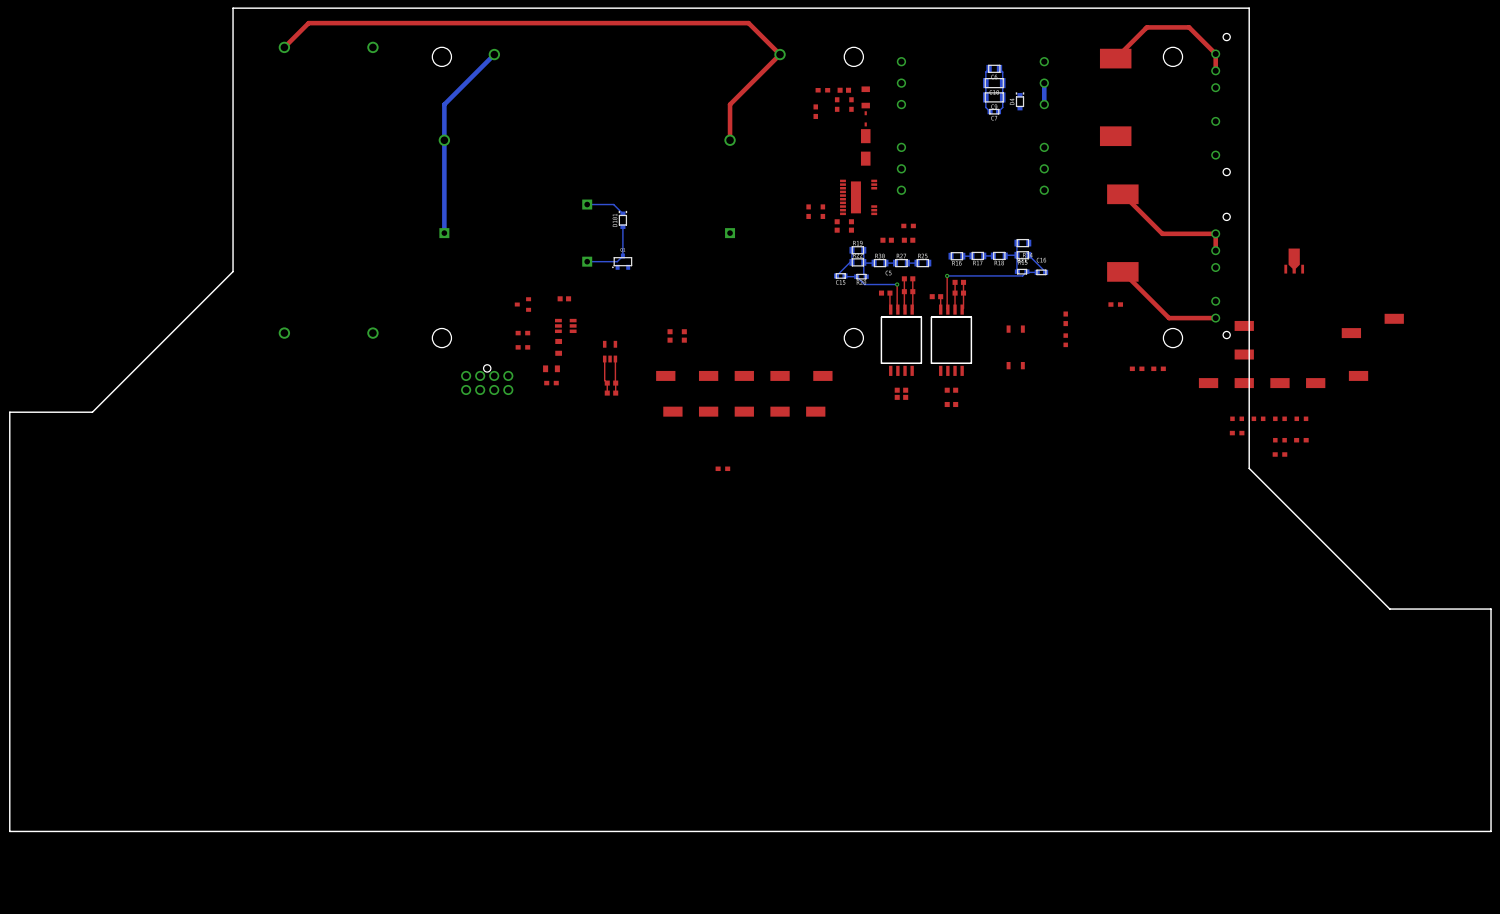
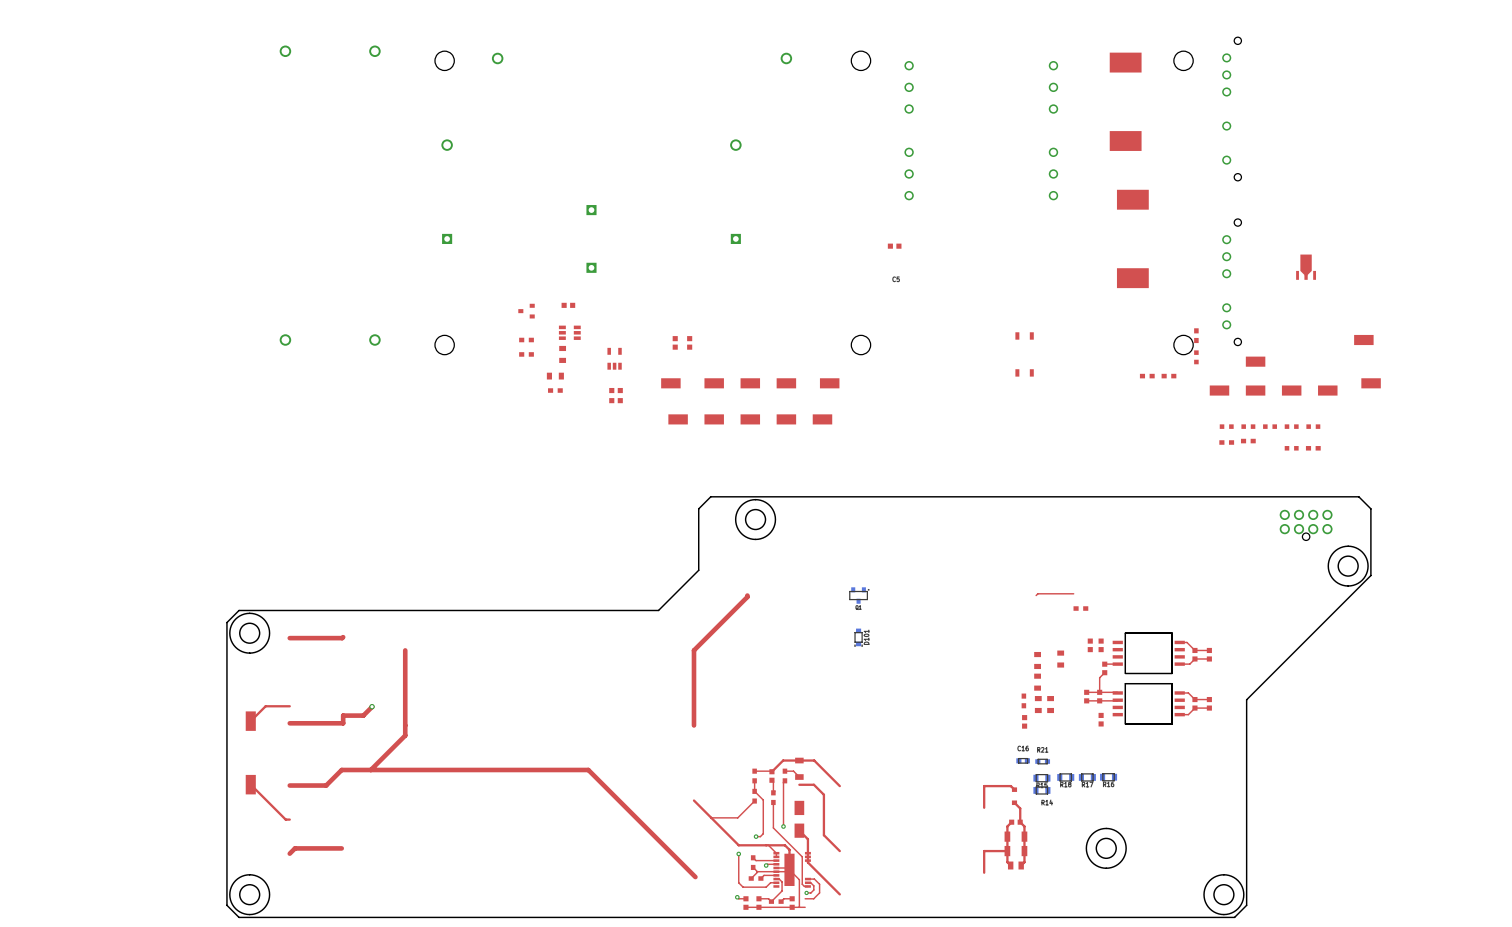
board edge: (1249, 8) (233, 8) (233, 271) (92, 412) (9, 412) (9, 831) (1491, 831) (1491, 609) (1389, 609) (1249, 468) (1249, 8) -> none
top track: (284, 47) (308, 23) (748, 23) (780, 54) (730, 104) (730, 140) -> none
bottom track: (494, 54) (444, 104) (444, 233) -> none
top track: (1115, 58) (1146, 27) (1189, 27) (1215, 53) (1215, 70) -> none
bottom track: (989, 68) (985, 72) (985, 107) (990, 111) -> none
part: (994, 68) -> none
bottom track: (999, 68) (1002, 72) (1002, 107) (998, 111) -> none
part: (994, 83) -> none
bottom track: (1044, 83) (1044, 104) -> none
part: (822, 90) -> none
part: (844, 90) -> none
part: (865, 97) -> none
part: (994, 97) -> none
part: (1020, 101) -> none
part: (837, 104) -> none
part: (851, 104) -> none
part: (815, 111) -> none
part: (994, 111) -> none
part: (865, 118) -> none
part: (865, 147) -> none
top track: (1122, 194) (1162, 233) (1215, 233) (1215, 250) -> none
part: (858, 197) -> none
bottom track: (587, 204) (613, 204) (622, 213) -> none
part: (808, 211) -> none
part: (822, 211) -> none
part rotation: 0° (622, 219) -> 180° (858, 637)
part position: (622, 219) -> (858, 637)
part: (837, 225) -> none
part: (851, 225) -> none
part: (908, 225) -> none
bottom track: (622, 226) (622, 256) (617, 261) (587, 261) -> none
part: (908, 240) -> none
bottom track: (1016, 243) (1017, 271) -> none
part position: (1022, 243) -> (1041, 790)
bottom track: (851, 250) (851, 262) (836, 275) -> none
part: (857, 250) -> none
bottom track: (863, 250) (863, 274) (866, 276) -> none
bottom track: (971, 255) (962, 256) -> none
part position: (977, 255) -> (1087, 777)
bottom track: (993, 255) (983, 255) -> none
part position: (999, 255) -> (1065, 777)
bottom track: (1016, 255) (1005, 255) -> none
part position: (1022, 255) -> (1041, 778)
bottom track: (1028, 255) (1045, 272) -> none
part position: (956, 256) -> (1108, 777)
part rotation: 0° (622, 261) -> 180° (859, 595)
part position: (622, 261) -> (859, 595)
part: (857, 262) -> none
bottom track: (874, 263) (863, 263) -> none
part: (880, 263) -> none
bottom track: (895, 263) (885, 263) -> none
part: (901, 263) -> none
bottom track: (916, 263) (907, 263) -> none
part: (922, 263) -> none
part position: (1022, 271) -> (1042, 761)
top track: (1122, 271) (1169, 318) (1215, 318) -> none
bottom track: (1037, 272) (1026, 271) (1022, 275) (947, 275) -> none
part position: (1041, 272) -> (1023, 760)
part: (840, 275) -> none
bottom track: (844, 275) (856, 276) (864, 284) (897, 284) -> none
top track: (947, 275) (947, 309) -> none
via: (947, 275) -> none
part: (861, 276) -> none
top track: (904, 278) (905, 309) -> none
part: (908, 278) -> none
top track: (912, 278) (912, 309) -> none
top track: (955, 282) (955, 293) -> none
part: (959, 282) -> none
top track: (963, 282) (962, 309) -> none
top track: (897, 284) (897, 309) -> none
via: (897, 284) -> none
part: (908, 291) -> none
part: (885, 293) -> none
top track: (889, 293) (890, 309) -> none
top track: (955, 293) (955, 309) -> none
part: (959, 293) -> none
part: (936, 296) -> none
top track: (940, 296) (940, 309) -> none
part: (1115, 304) -> none
part: (1065, 318) -> none
part: (1394, 318) -> none
part: (1244, 325) -> none
part: none -> (1196, 335)
part: (901, 340) -> none
part: (951, 340) -> none
part: (1065, 340) -> none
part: none -> (1196, 357)
top track: (604, 359) (604, 380) (607, 383) (607, 393) -> none
top track: (615, 359) (615, 393) -> none
part: (487, 379) -> none
part: (901, 390) -> none
part: (951, 390) -> none
part: (901, 397) -> none
part: (951, 404) -> none
part: none -> (1226, 426)
part position: (1279, 454) -> (1226, 442)
part: (722, 468) -> none
board edge: none -> (1358, 496) (1370, 508) (1370, 575) (1246, 699) (1246, 905) (1234, 917) (239, 917) (226, 905) (226, 622) (239, 610) (658, 610) (698, 570) (698, 508) (710, 496) (1358, 496)
board edge: none -> (755, 499) (763, 501) (769, 505) (773, 511) (775, 519) (773, 527) (769, 533) (763, 537) (755, 539) (747, 537) (741, 533) (737, 527) (735, 519) (737, 511) (741, 505) (747, 501) (755, 499)
round board edge: none -> [744, 508, 767, 531]
part: none -> (1306, 525)
board edge: none -> (1348, 546) (1355, 547) (1362, 552) (1366, 558) (1368, 566) (1366, 573) (1362, 580) (1355, 584) (1348, 586) (1340, 584) (1334, 580) (1329, 573) (1328, 566) (1329, 558) (1334, 552) (1340, 547) (1348, 546)
round board edge: none -> [1337, 555, 1359, 577]
top track: none -> (1073, 593) (1037, 593) (1036, 595)
top track: none -> (747, 595) (693, 650) (693, 725)
part: none -> (1080, 608)
board edge: none -> (249, 613) (257, 614) (263, 619) (268, 625) (269, 633) (268, 640) (263, 647) (257, 651) (249, 653) (242, 651) (235, 647) (231, 640) (229, 633) (231, 625) (235, 619) (242, 614) (249, 613)
round board edge: none -> [239, 622, 261, 644]
top track: none -> (343, 637) (289, 638)
top track: none -> (1179, 642) (1186, 642) (1194, 650) (1209, 650)
part: none -> (1090, 645)
part: none -> (1101, 645)
top track: none -> (405, 650) (405, 735) (370, 769)
part: none -> (1148, 653)
part: none -> (1194, 654)
part: none -> (1209, 654)
part: none -> (1060, 659)
top track: none -> (1209, 658) (1194, 658) (1189, 664) (1179, 664)
part: none -> (1037, 660)
top track: none -> (1117, 664) (1104, 664)
part: none -> (1104, 668)
top track: none -> (1104, 672) (1099, 677) (1099, 692)
part: none -> (1037, 682)
top track: none -> (1086, 692) (1117, 692)
top track: none -> (1179, 692) (1188, 692) (1194, 699) (1209, 699)
part: none -> (1086, 696)
part: none -> (1099, 696)
top track: none -> (1117, 700) (1086, 700)
part: none -> (1023, 700)
part: none -> (1038, 704)
part: none -> (1050, 704)
part: none -> (1148, 703)
part: none -> (1194, 703)
part: none -> (1209, 703)
top track: none -> (289, 706) (265, 706) (250, 721)
top track: none -> (372, 706) (363, 715) (343, 715) (343, 723) (289, 723)
via: none -> (372, 706)
top track: none -> (1209, 708) (1194, 708) (1188, 714) (1179, 714)
part: none -> (1101, 719)
part: none -> (250, 721)
part: none -> (1024, 721)
part: none -> (799, 768)
top track: none -> (754, 771) (771, 771) (783, 760) (814, 760) (839, 786)
top track: none -> (784, 771) (793, 771) (799, 777)
part: none -> (754, 776)
part: none -> (771, 776)
part: none -> (784, 776)
top track: none -> (771, 780) (773, 792) (774, 791)
top track: none -> (754, 780) (754, 791) (763, 800) (763, 833) (760, 836) (756, 836)
top track: none -> (784, 780) (783, 826)
top track: none -> (250, 784) (285, 819) (289, 819)
part: none -> (250, 784)
top track: none -> (289, 785) (326, 785) (341, 769) (588, 769) (695, 877)
top track: none -> (799, 784) (813, 784) (823, 794) (823, 835) (839, 851)
top track: none -> (1014, 789) (1010, 786) (984, 786) (984, 807)
part: none -> (754, 796)
part: none -> (1014, 796)
part: none -> (773, 797)
top track: none -> (693, 800) (738, 845) (784, 845) (789, 849) (789, 869) (787, 871) (757, 871)
top track: none -> (754, 801) (737, 817) (711, 817)
top track: none -> (773, 802) (773, 827) (802, 856) (802, 884) (807, 886)
top track: none -> (1014, 802) (1020, 808) (1020, 822) (1024, 826) (1024, 862) (1021, 865)
part: none -> (799, 819)
top track: none -> (1011, 822) (1007, 826) (1007, 862) (1010, 865)
part: none -> (1015, 822)
via: none -> (783, 826)
board edge: none -> (1106, 828) (1113, 829) (1120, 834) (1124, 840) (1126, 848) (1124, 855) (1120, 862) (1113, 866) (1106, 868) (1098, 866) (1092, 862) (1087, 855) (1086, 848) (1087, 840) (1092, 834) (1098, 829) (1106, 828)
top track: none -> (799, 830) (807, 839) (807, 862) (839, 894)
via: none -> (756, 836)
part: none -> (1015, 836)
round board edge: none -> [1095, 837, 1117, 860]
top track: none -> (766, 845) (776, 853) (776, 856)
top track: none -> (341, 848) (295, 848) (289, 853)
top track: none -> (1007, 851) (984, 851) (984, 872)
part: none -> (1015, 851)
top track: none -> (738, 853) (738, 882) (743, 887) (766, 887) (770, 882) (776, 882)
via: none -> (738, 853)
top track: none -> (753, 857) (755, 860) (776, 860)
part: none -> (753, 862)
top track: none -> (776, 864) (766, 865)
via: none -> (766, 865)
part: none -> (1015, 865)
top track: none -> (753, 867) (757, 871)
top track: none -> (776, 867) (787, 867) (799, 879) (799, 907)
part: none -> (792, 869)
top track: none -> (757, 871) (751, 878)
board edge: none -> (249, 874) (257, 876) (263, 880) (268, 887) (269, 894) (268, 902) (263, 908) (257, 913) (249, 914) (242, 913) (235, 908) (231, 902) (229, 894) (231, 887) (235, 880) (242, 876) (249, 874)
top track: none -> (776, 875) (764, 875) (760, 878)
board edge: none -> (1223, 874) (1231, 876) (1237, 880) (1242, 887) (1243, 894) (1242, 902) (1237, 908) (1231, 913) (1223, 914) (1216, 913) (1209, 908) (1205, 902) (1204, 894) (1205, 887) (1209, 880) (1216, 876) (1223, 874)
part: none -> (756, 878)
top track: none -> (775, 878) (782, 881) (782, 890) (771, 901) (768, 898) (758, 898)
top track: none -> (807, 879) (814, 879) (819, 884) (819, 892) (813, 898) (805, 898)
top track: none -> (807, 882) (813, 885) (813, 890) (810, 892) (806, 892)
round board edge: none -> [239, 884, 261, 906]
round board edge: none -> [1213, 884, 1235, 906]
via: none -> (806, 892)
top track: none -> (737, 897) (745, 898)
via: none -> (737, 897)
top track: none -> (792, 898) (783, 898) (781, 901)
part: none -> (776, 901)
part: none -> (745, 903)
part: none -> (758, 903)
part: none -> (792, 903)
top track: none -> (805, 907) (745, 907)

